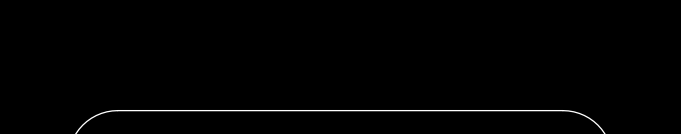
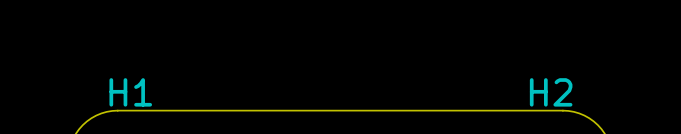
H1 name: none -> H1 (130, 92)
H2 name: none -> H2 (551, 92)

